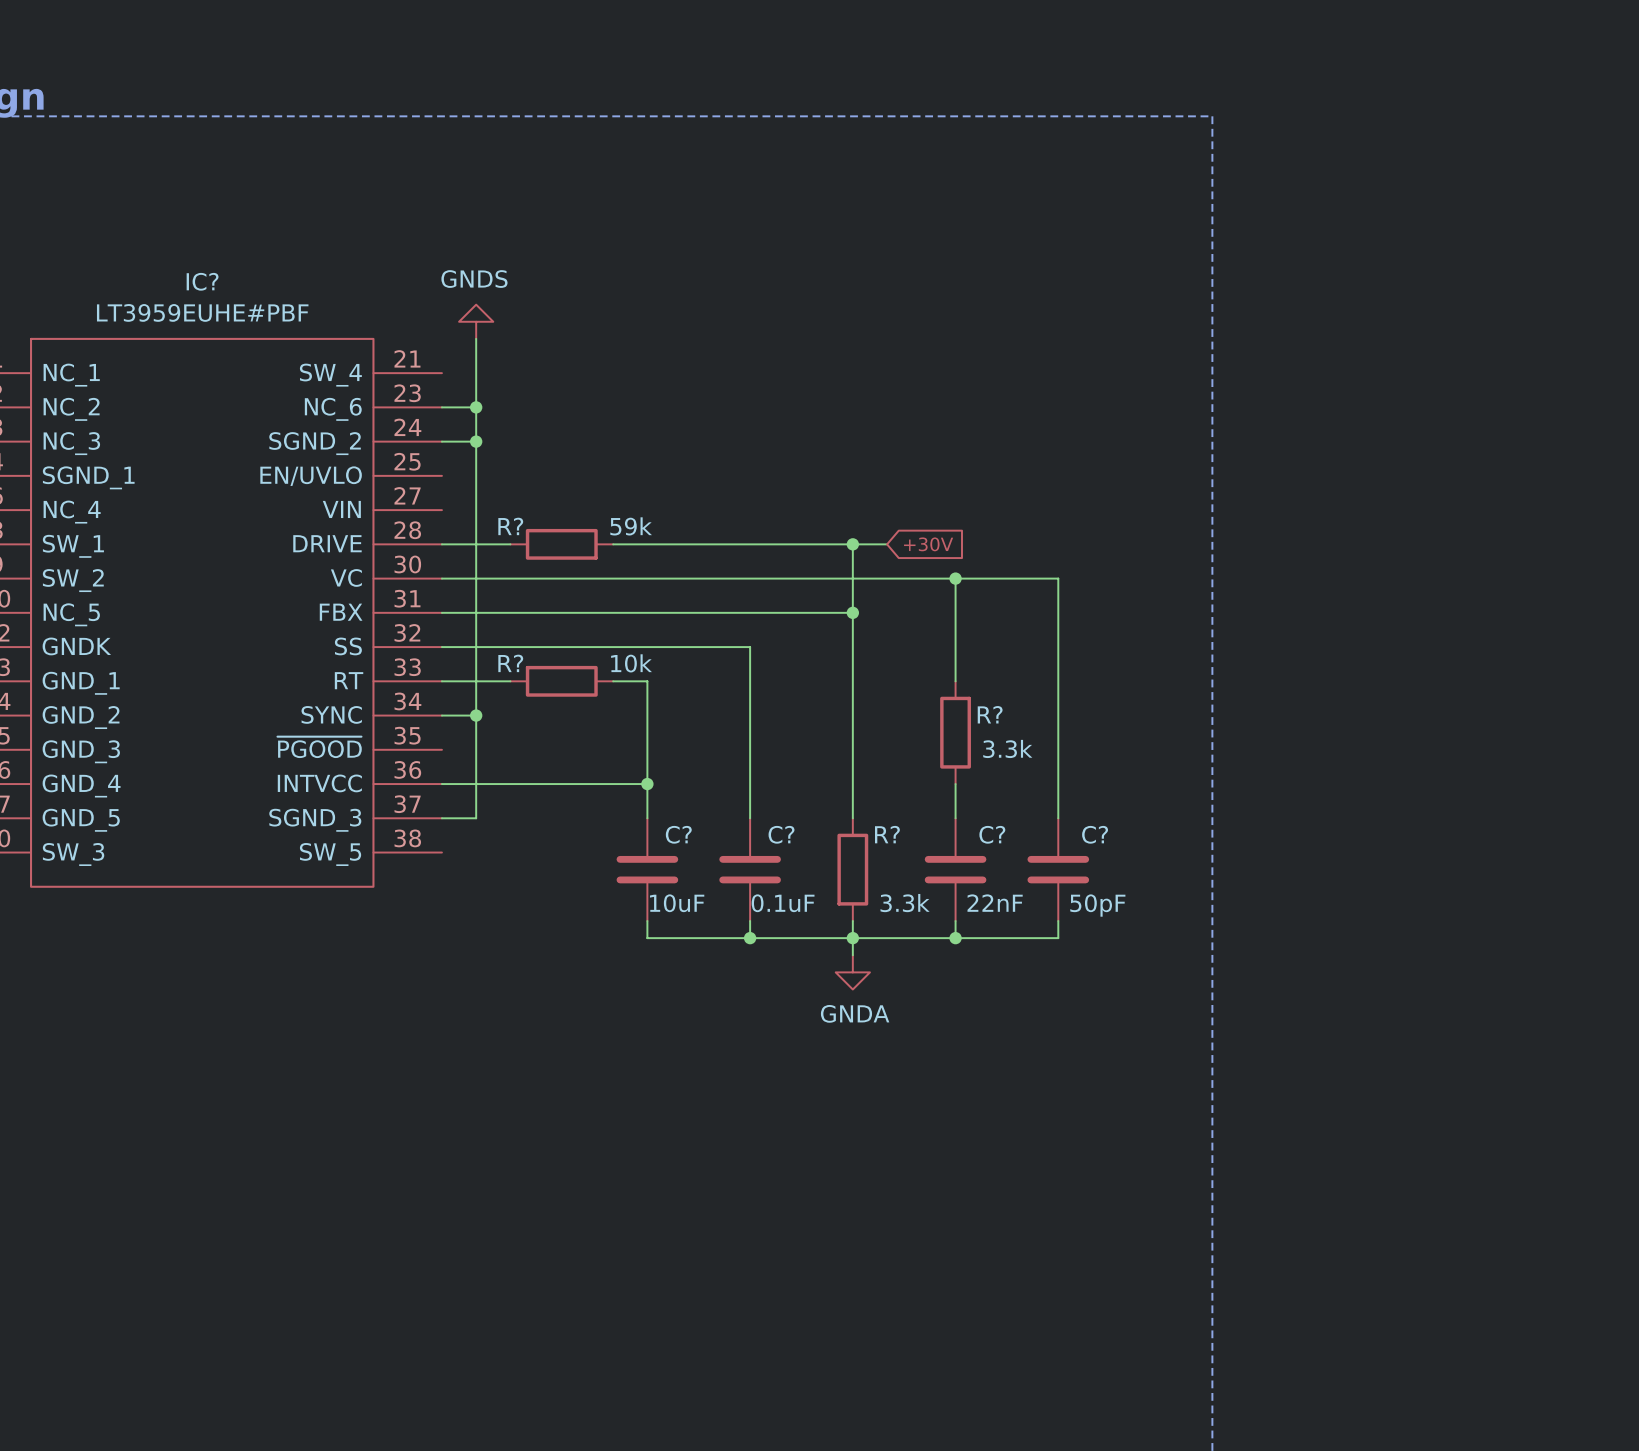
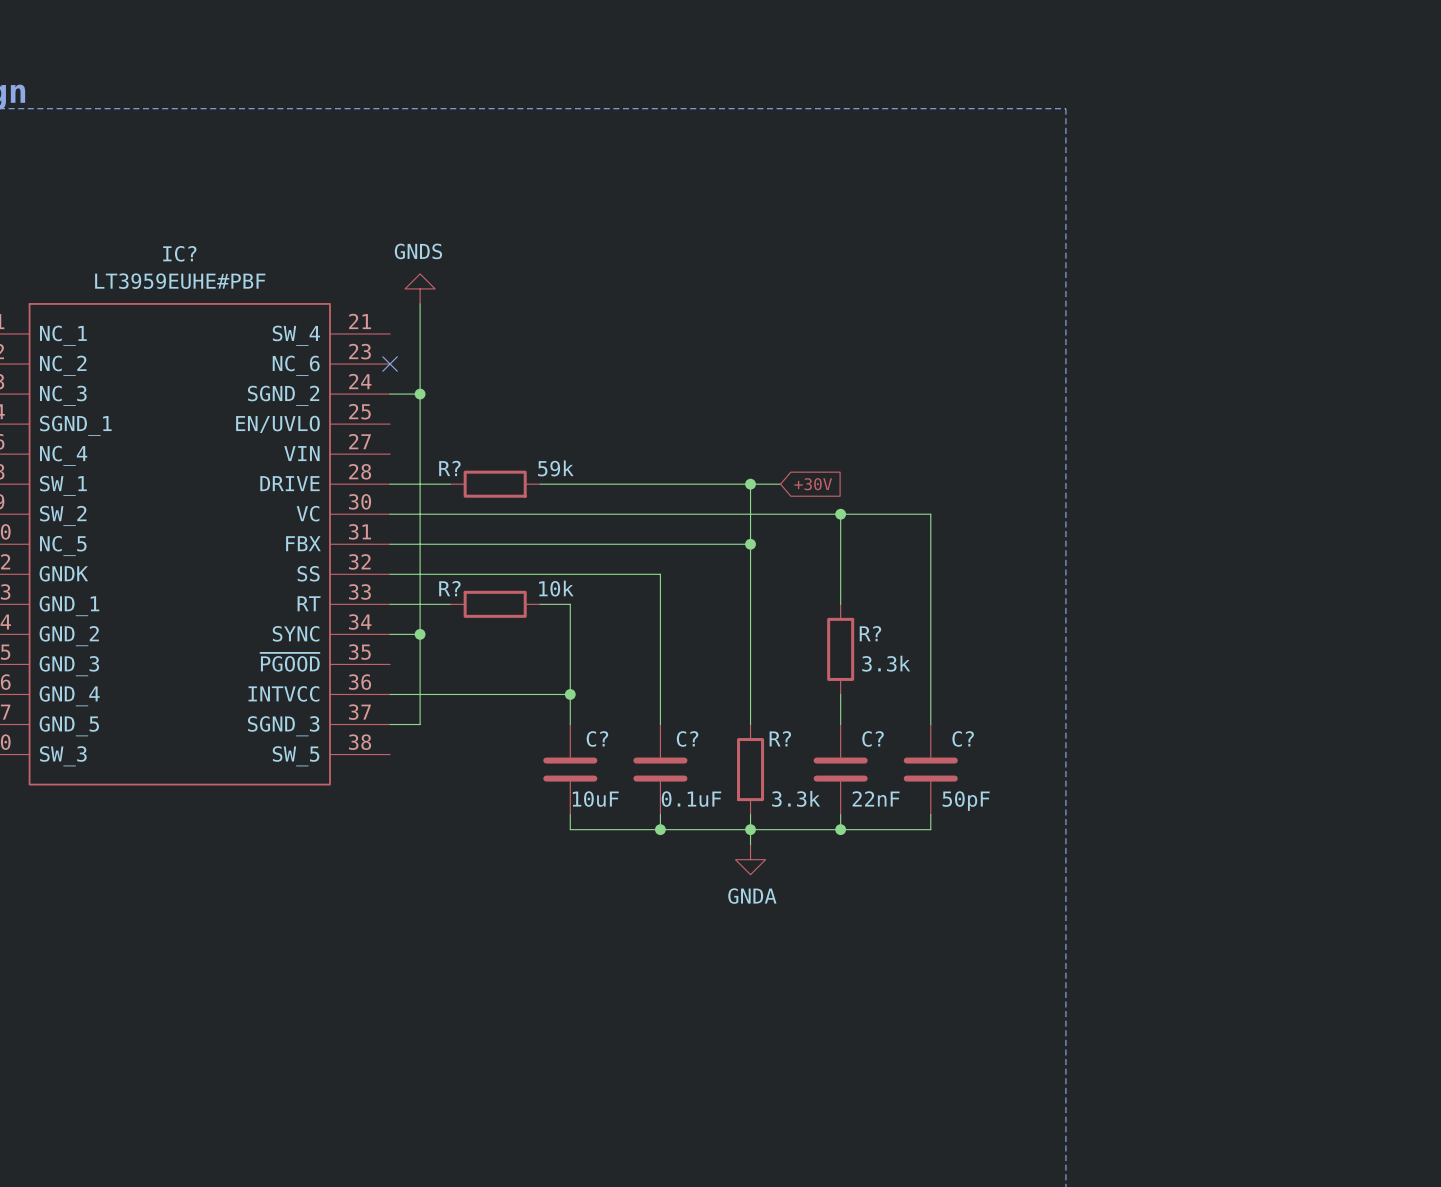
wire: (441, 407) (476, 407) -> none
no-connect mark: none -> (390, 364)
junction: (476, 407) -> none

